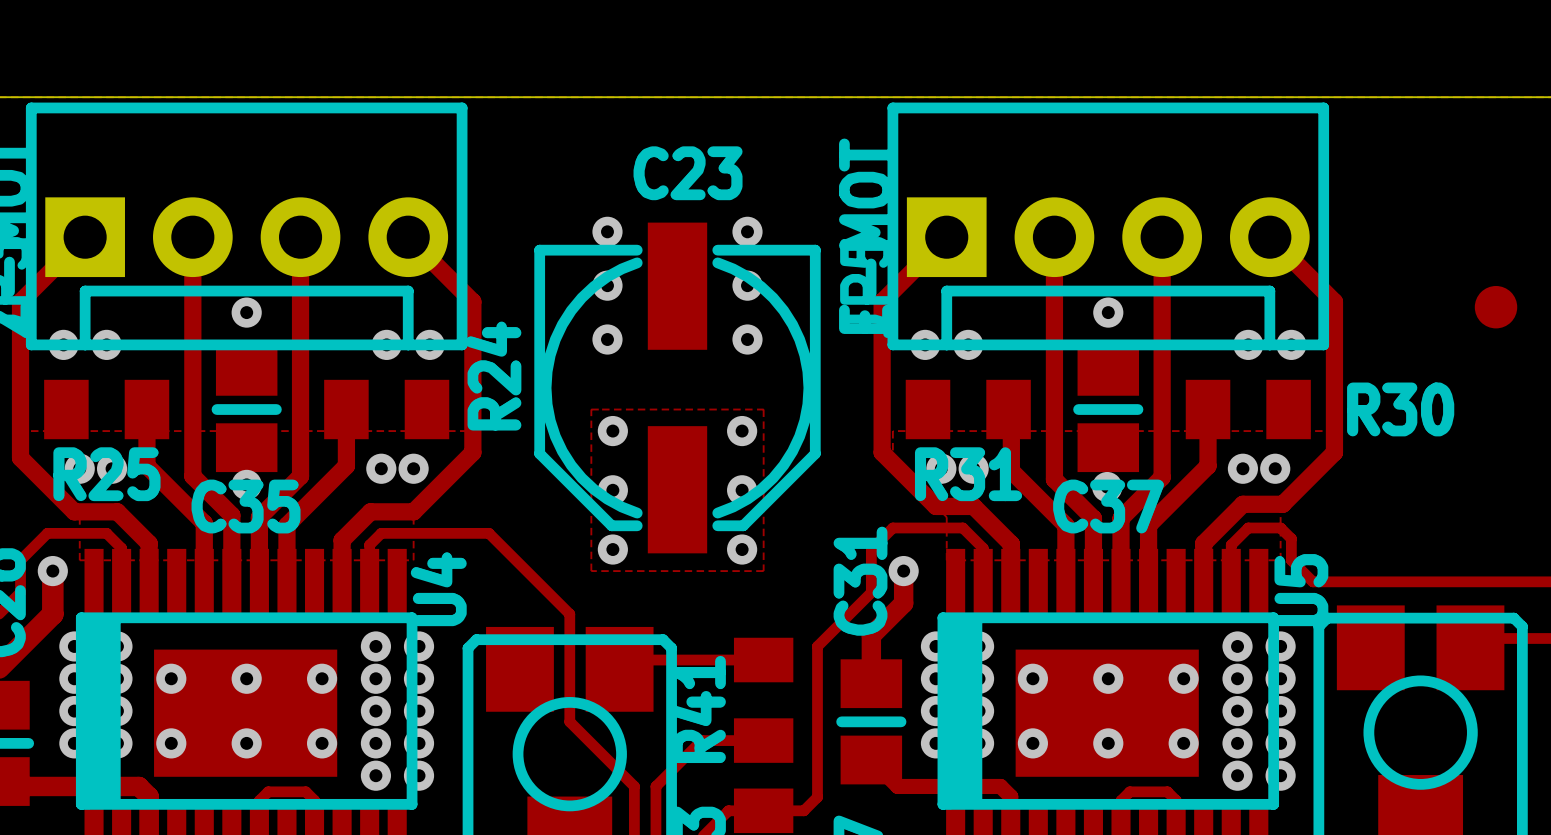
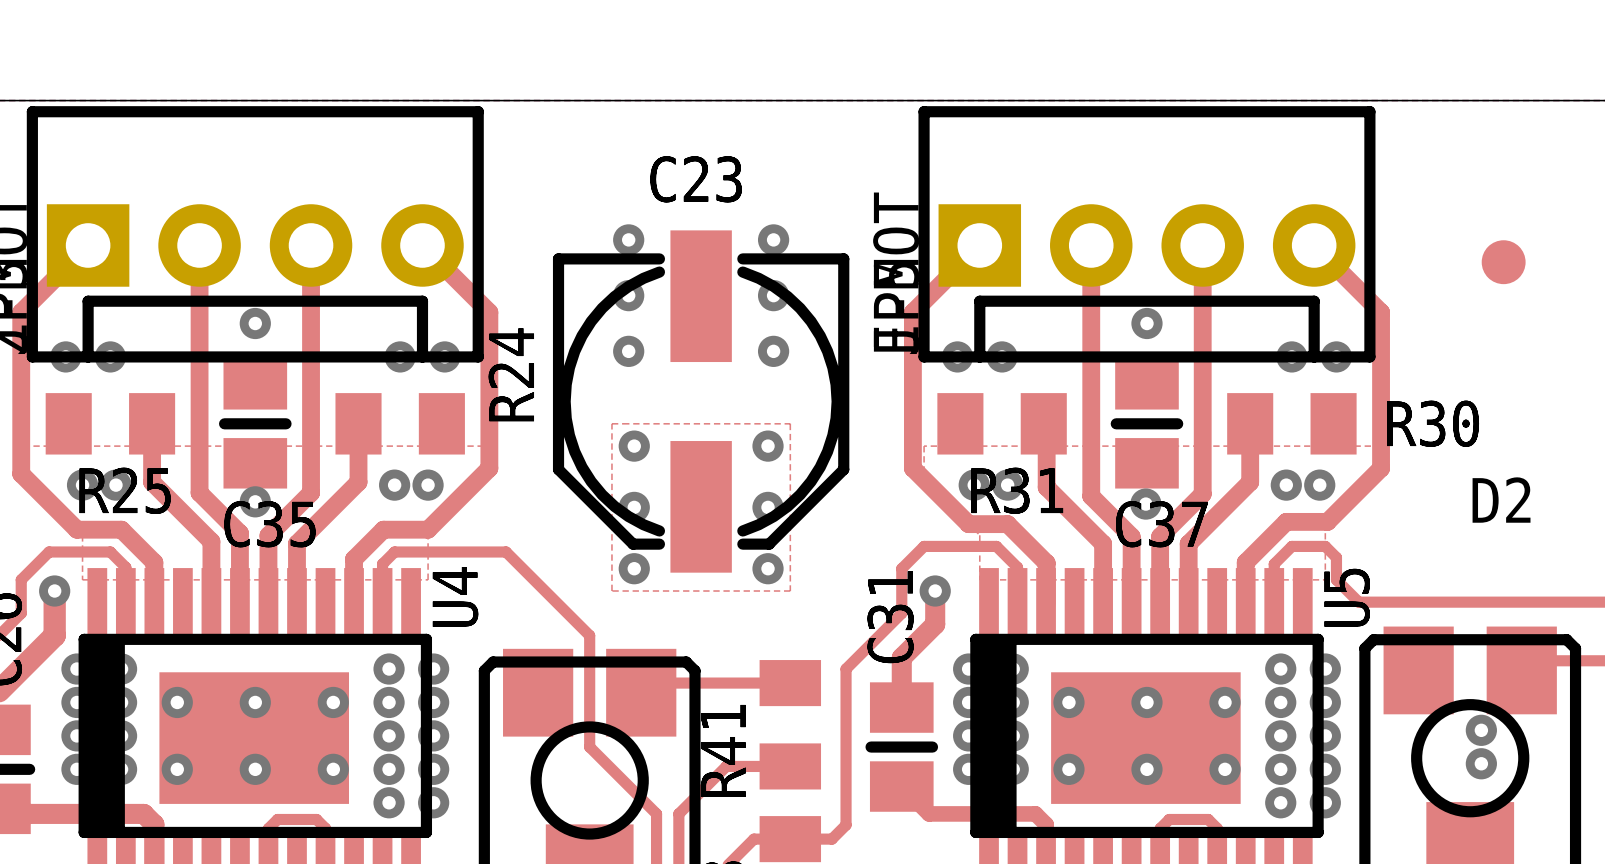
part position: (1496, 307) -> (1503, 262)
text: none -> D2 (1501, 500)
via: none -> (1481, 730)
via: none -> (1481, 763)

